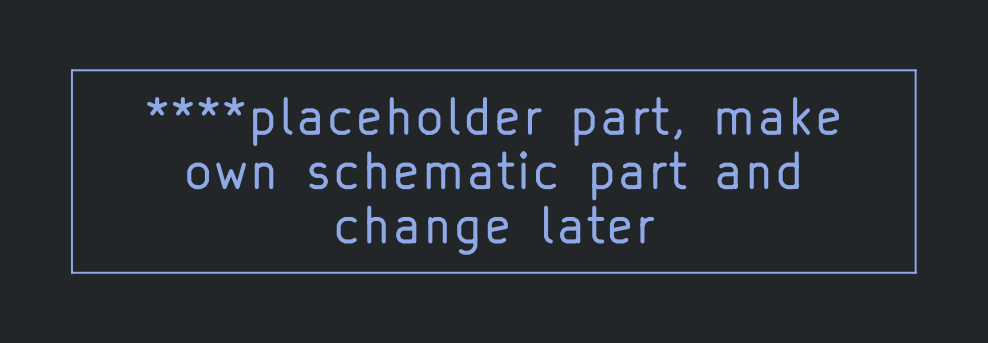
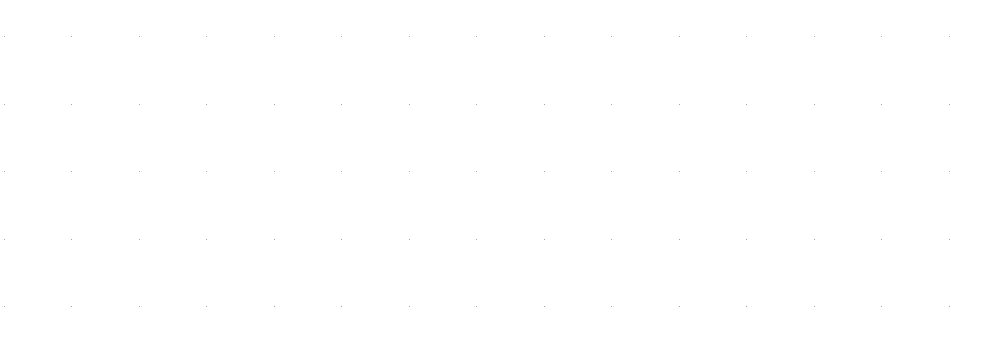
line: (71, 70) (915, 70) (915, 272) (71, 272) (71, 70) -> none
text: ****placeholder part, make (493, 121) -> none
text: own schematic part and (493, 175) -> none
text: change later (495, 230) -> none

